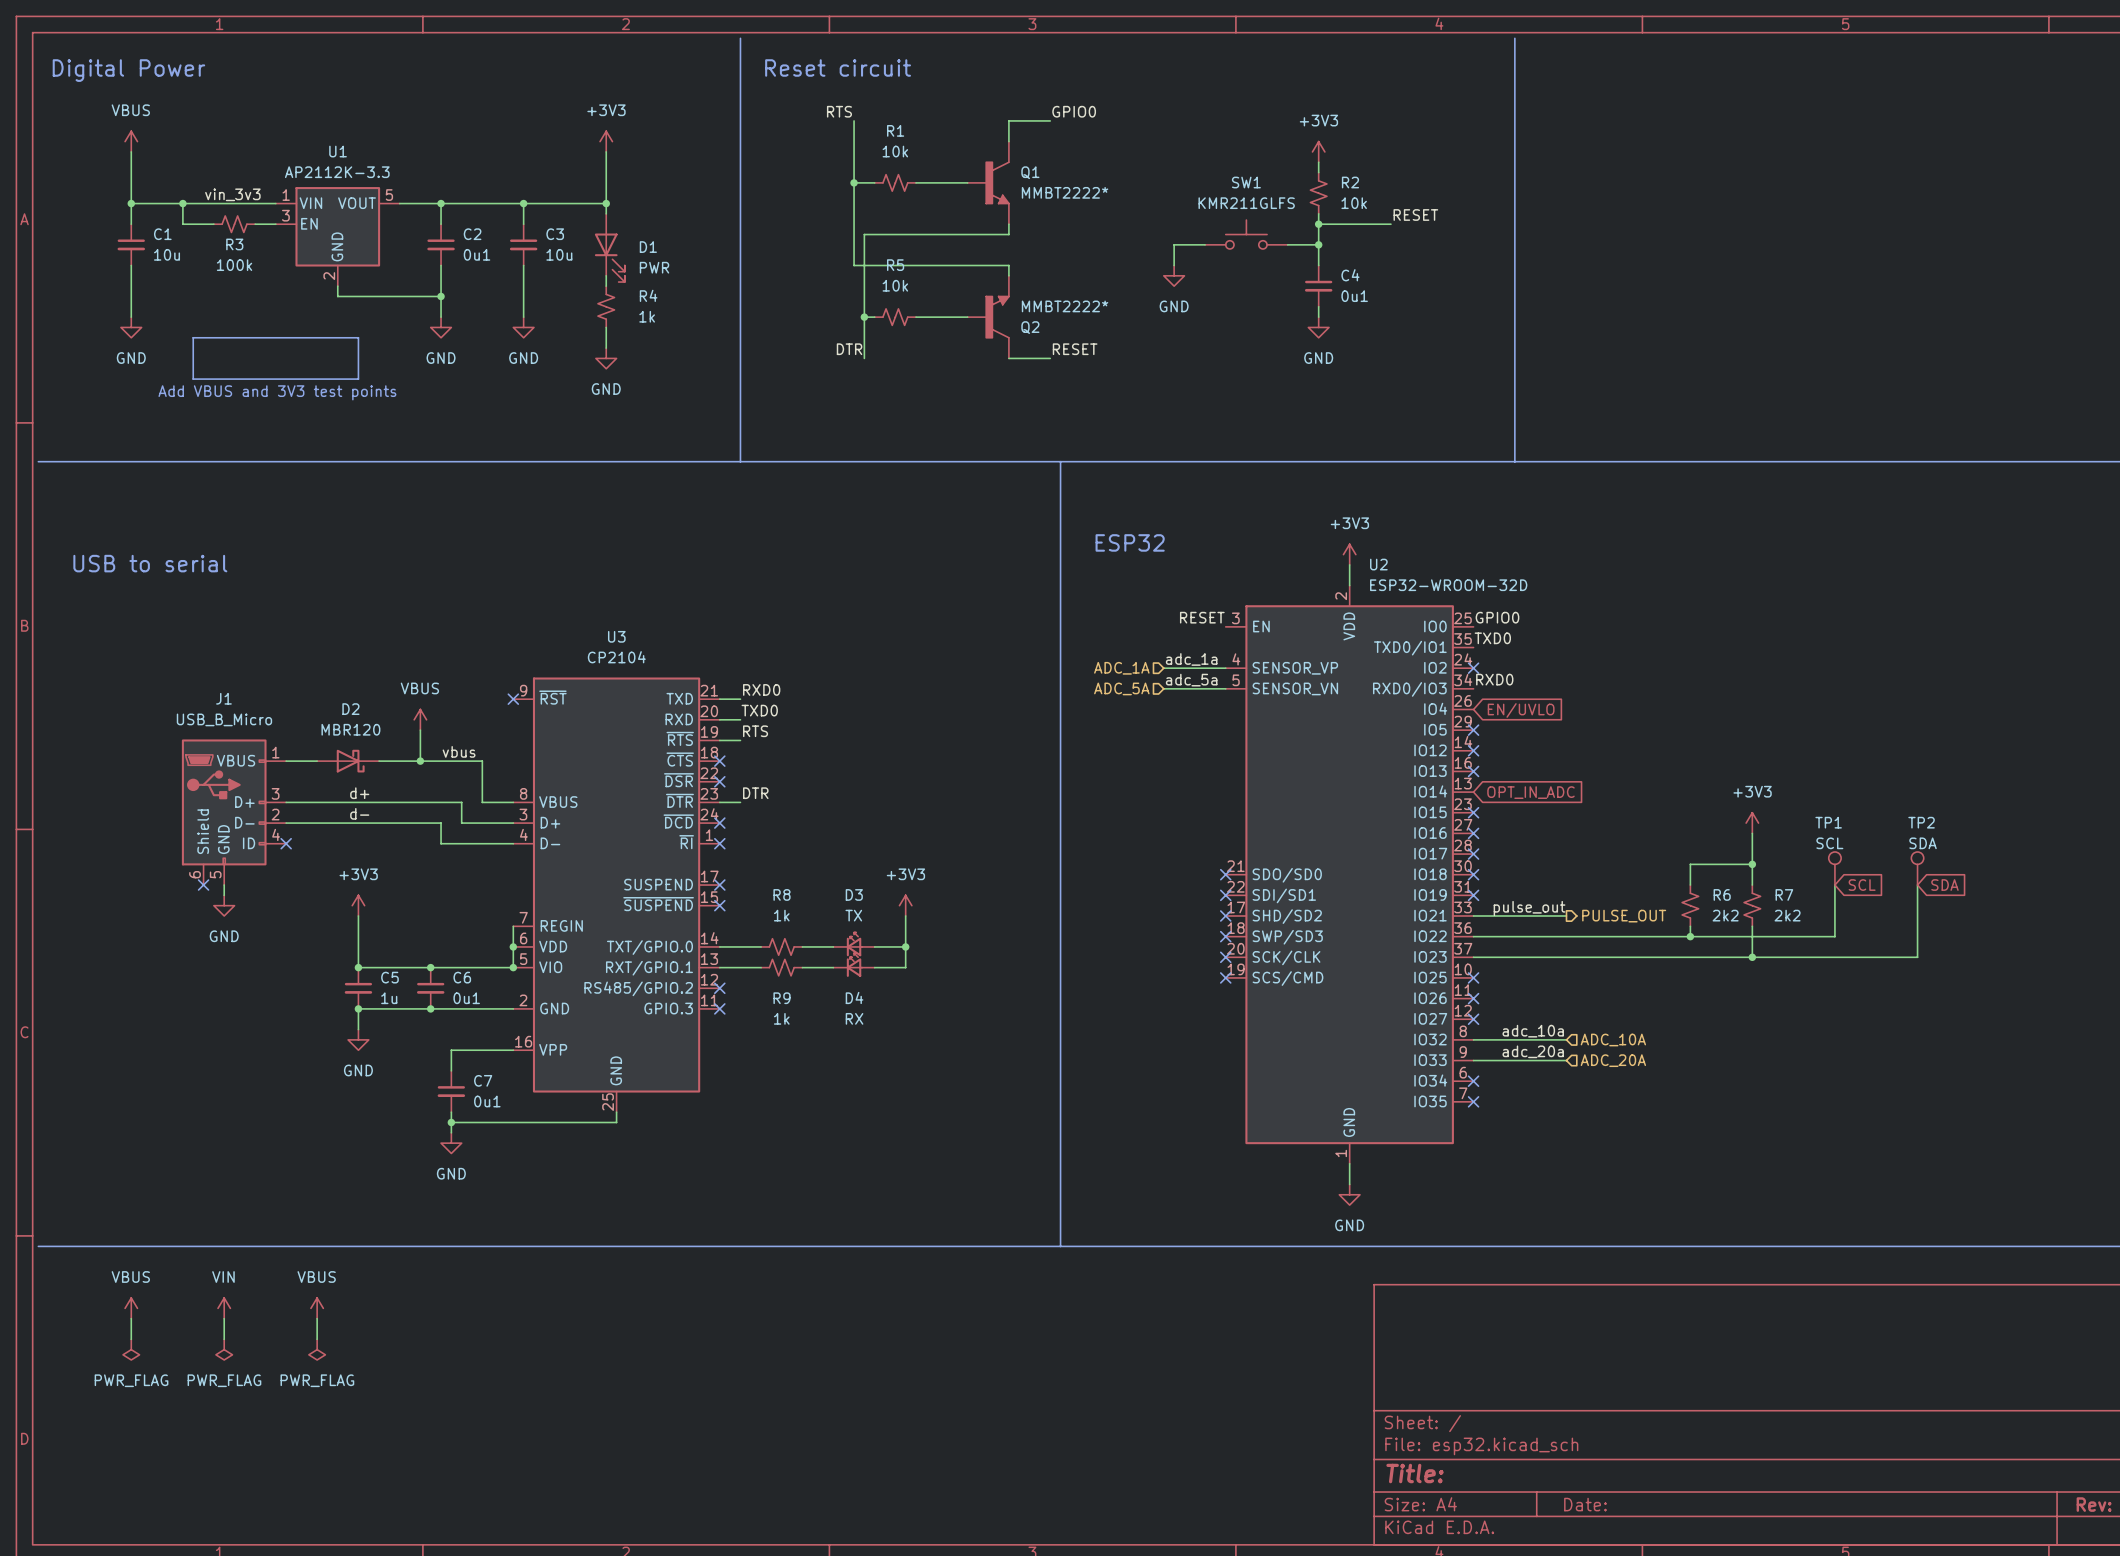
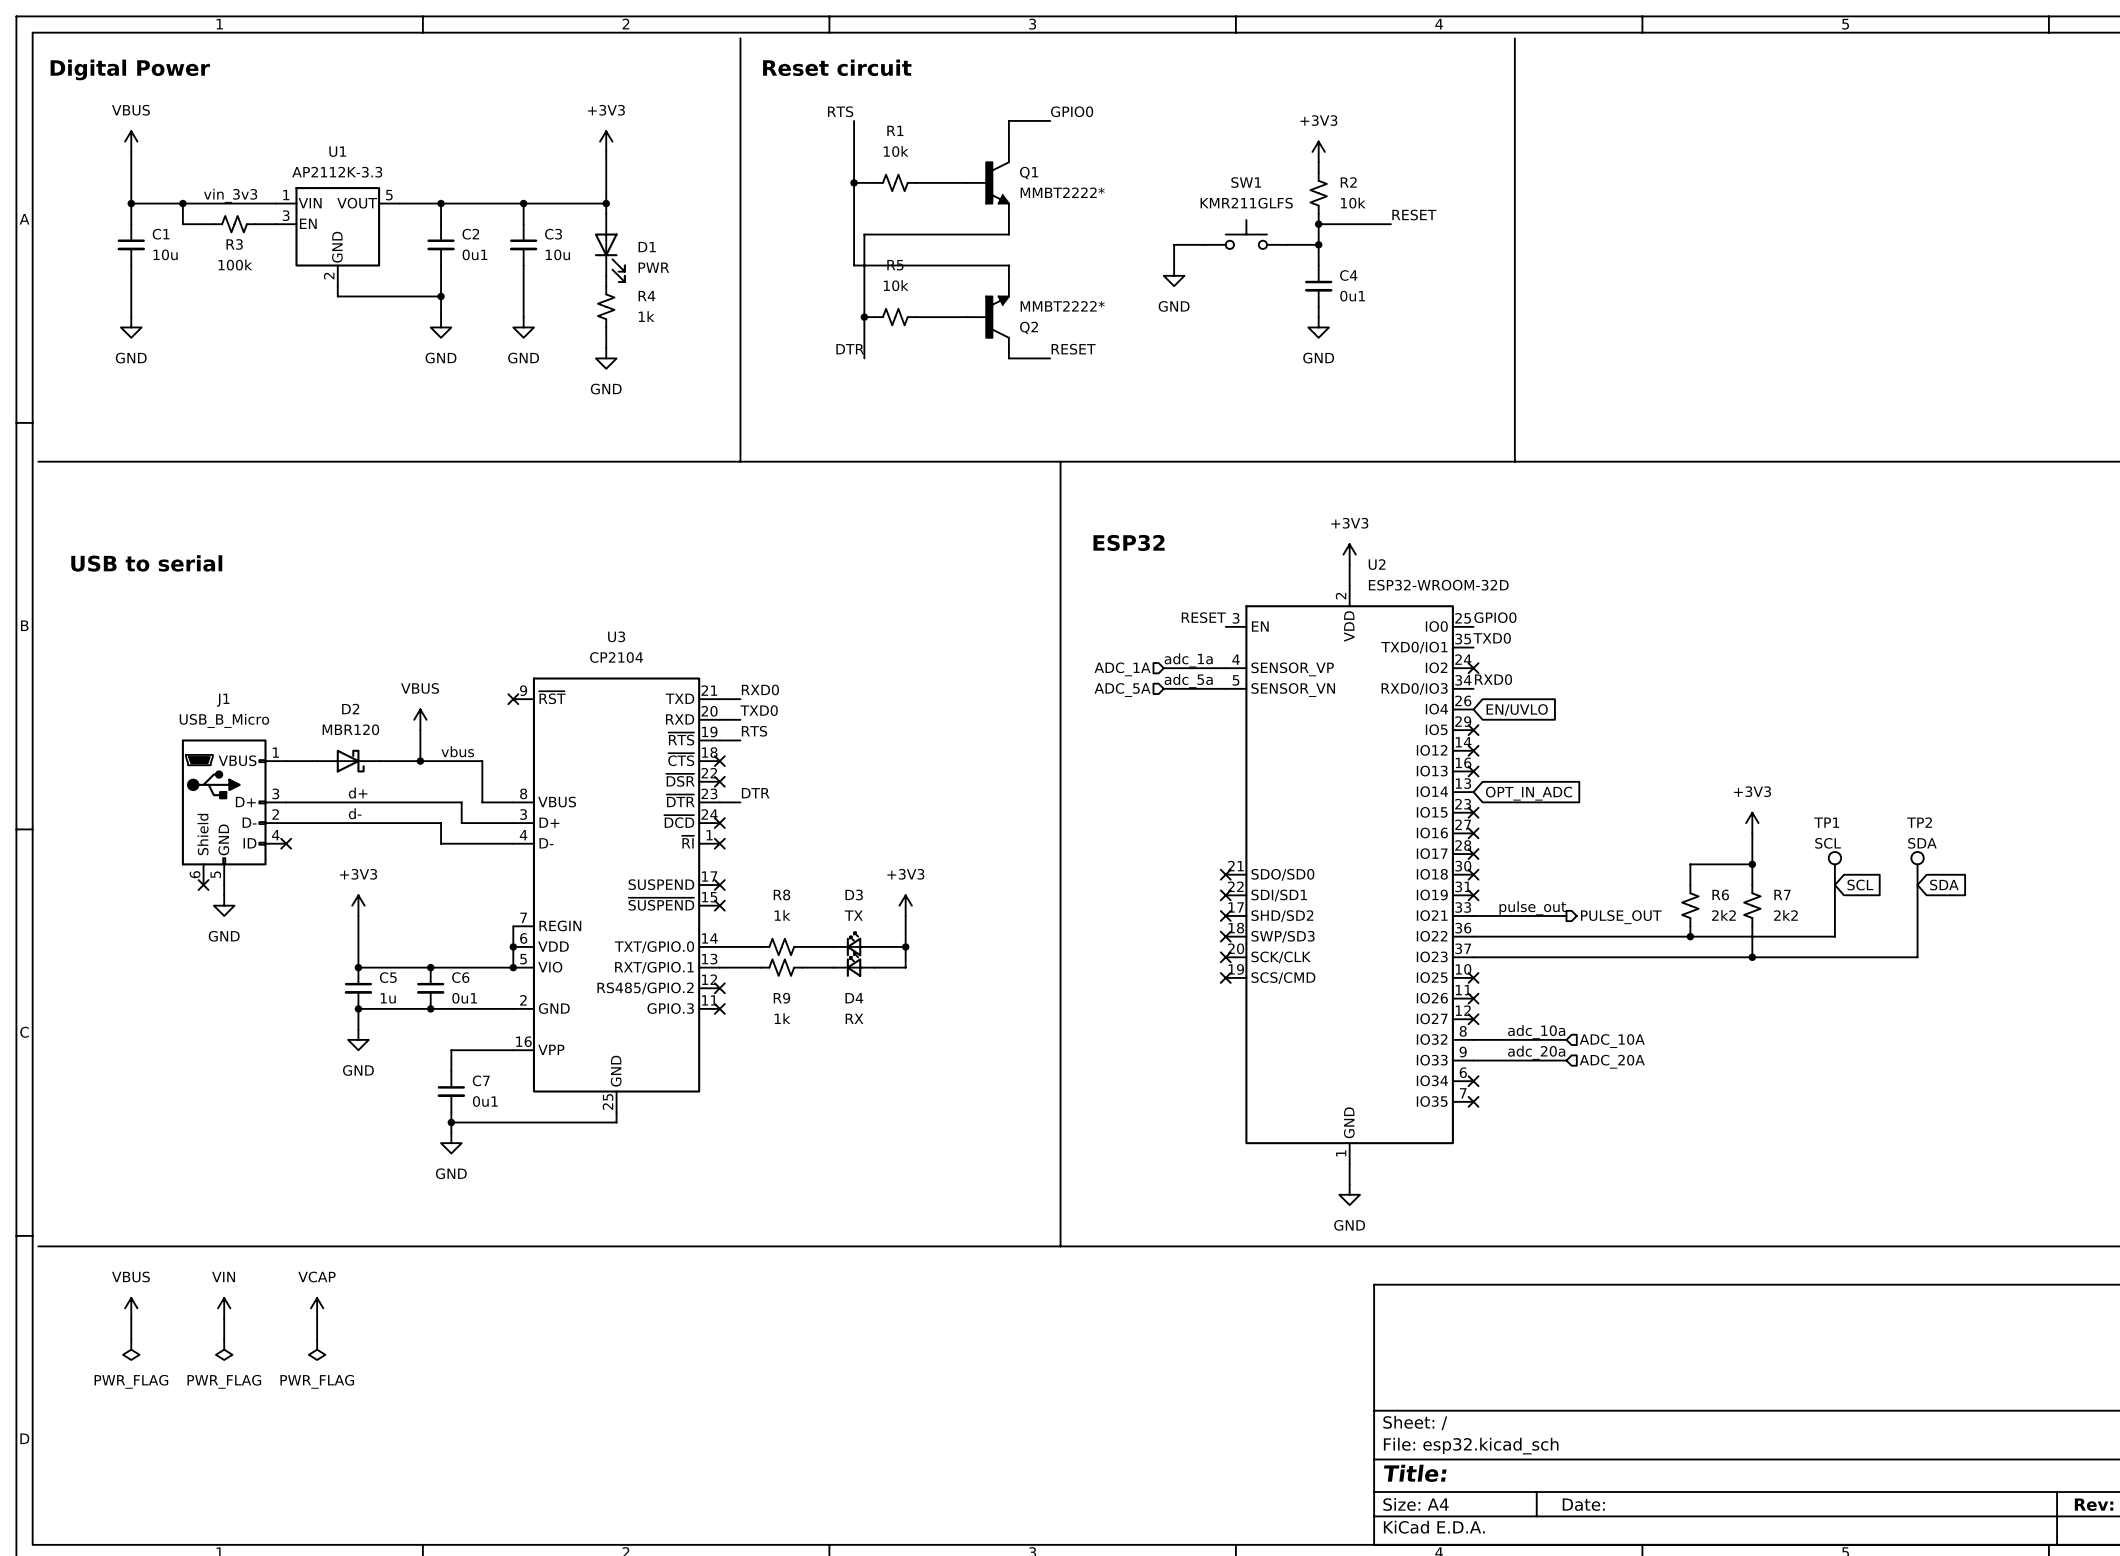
line: (193, 337) (358, 337) (358, 379) (193, 379) (193, 337) -> none
text: Add VBUS and 3V3 test points (277, 392) -> none
power symbol: VBUS (317, 1308) -> VCAP (317, 1308)

